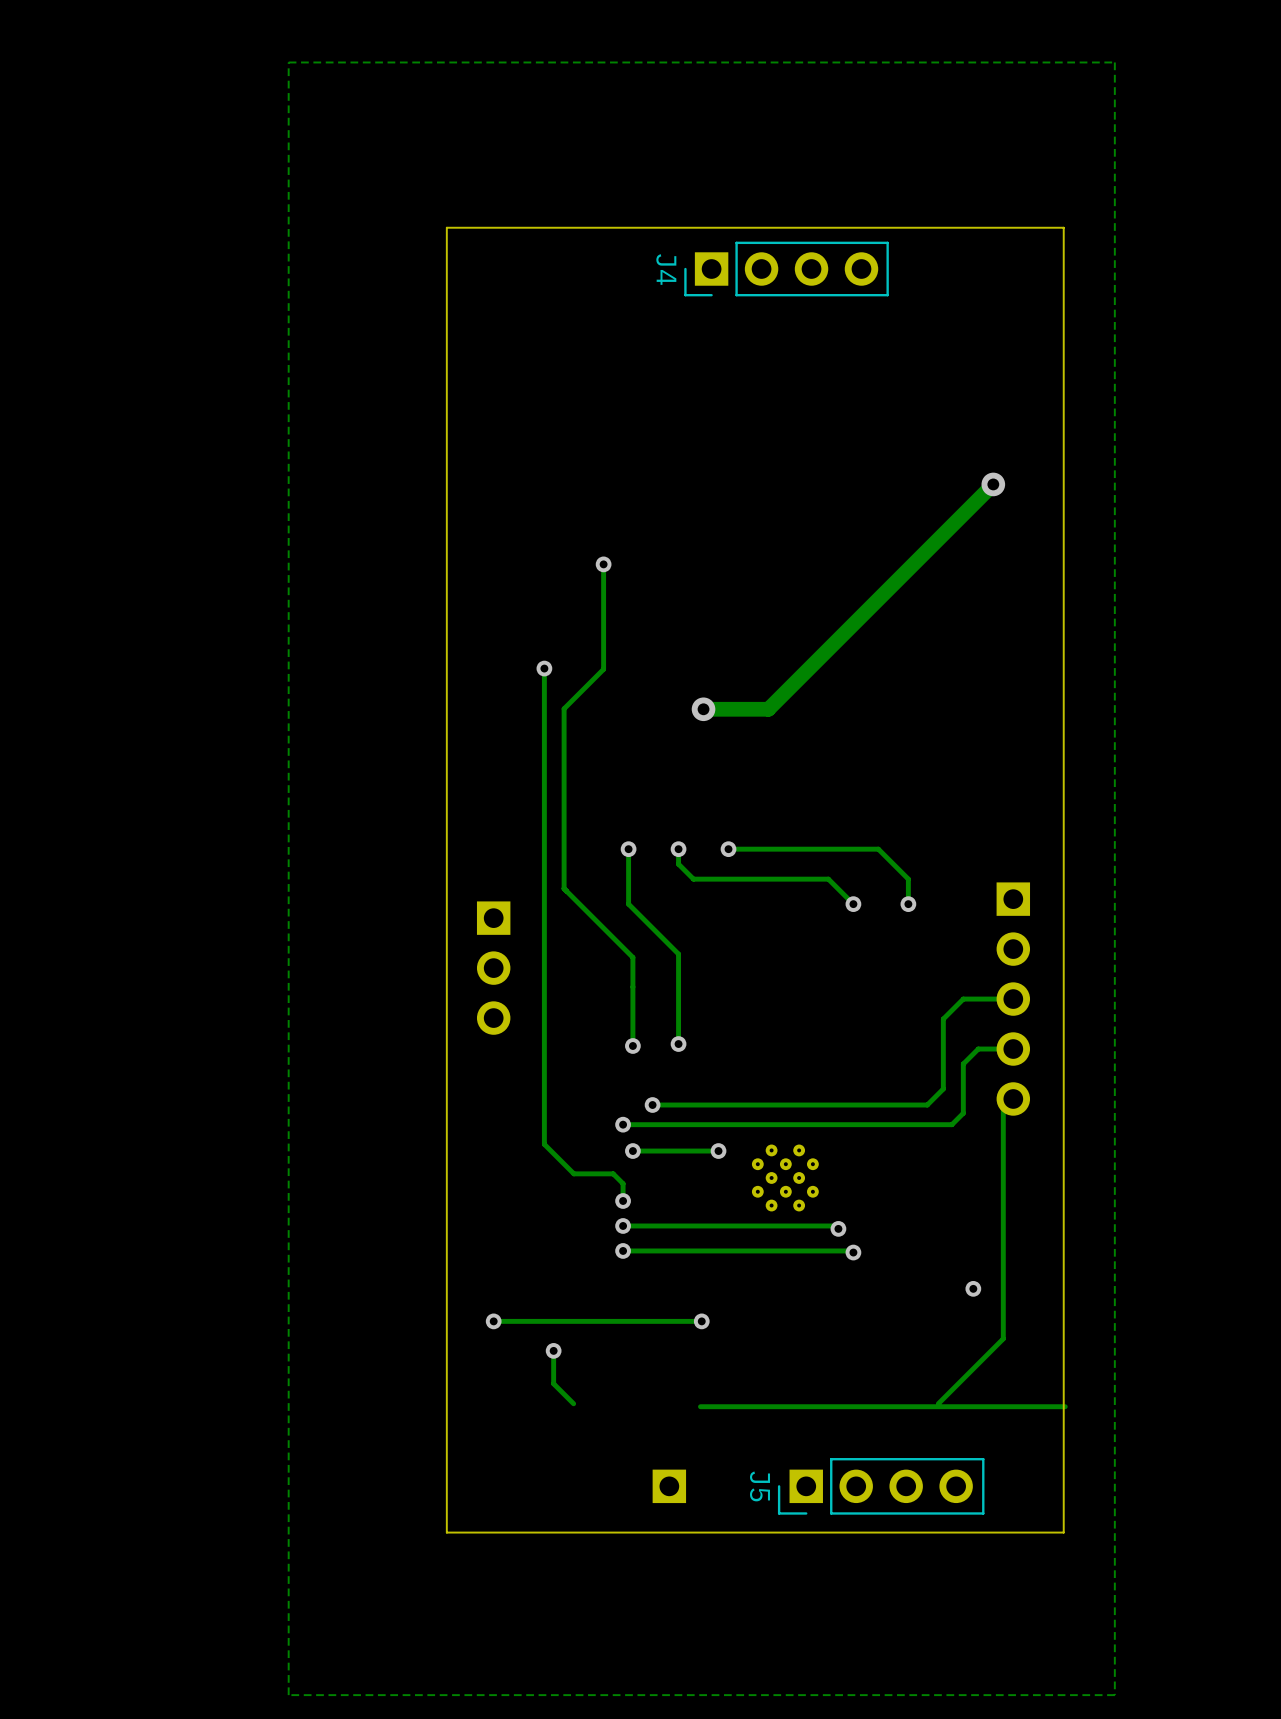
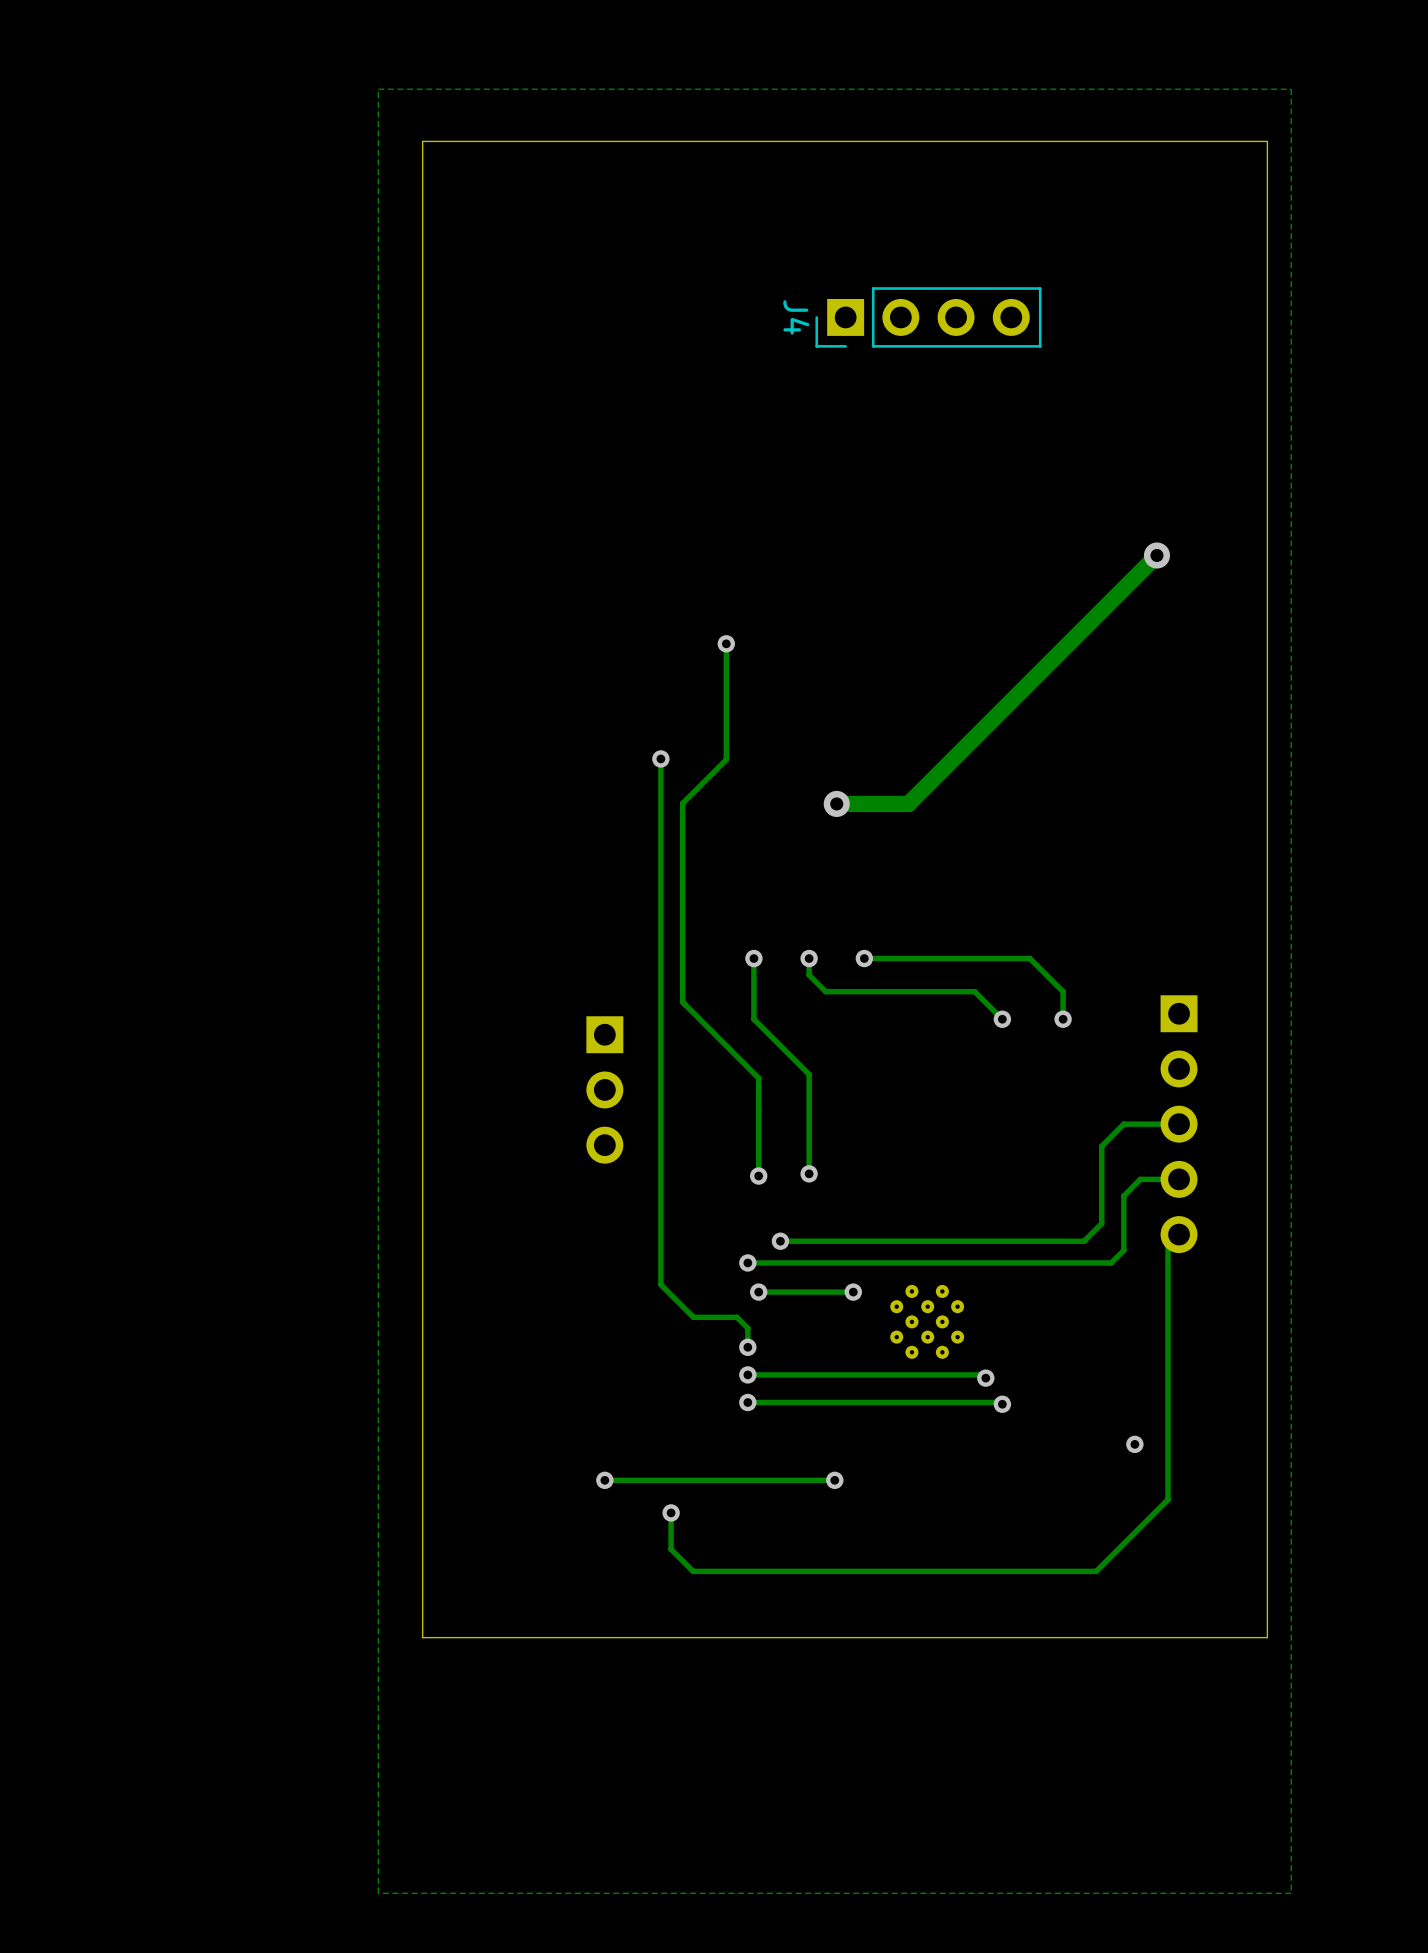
board edge: (1063, 227) (446, 227) (446, 1532) (1063, 1532) (1063, 227) -> (1267, 141) (1267, 1637) (422, 1637) (422, 141) (1267, 141)
track: (1065, 1406) (700, 1406) -> (1096, 1571) (693, 1571)
part: (669, 1486) -> none
J5: (881, 1486) -> none

